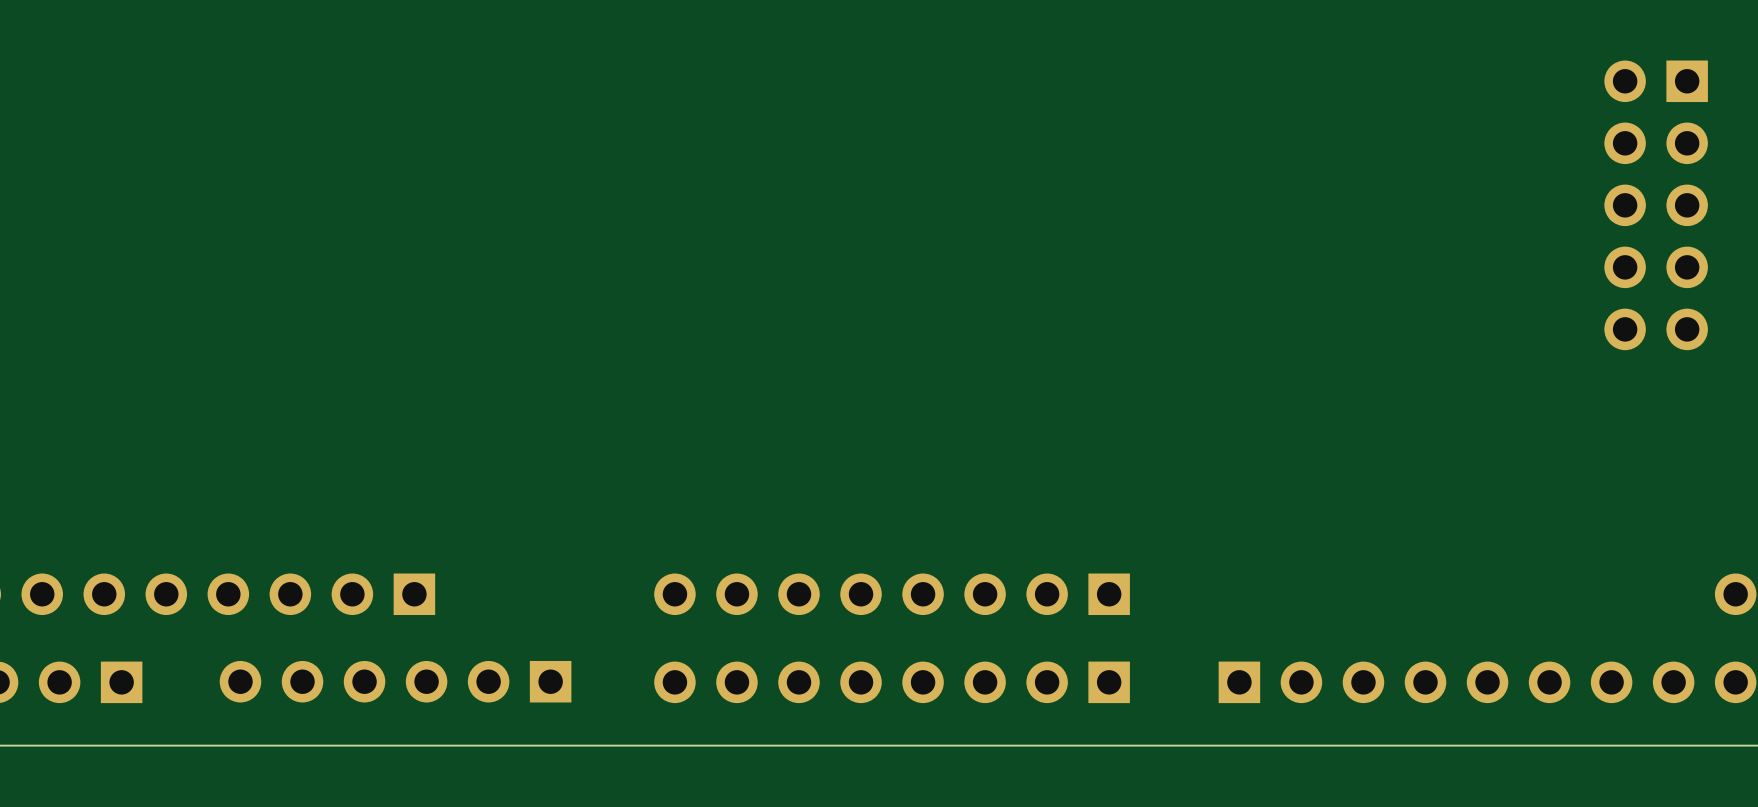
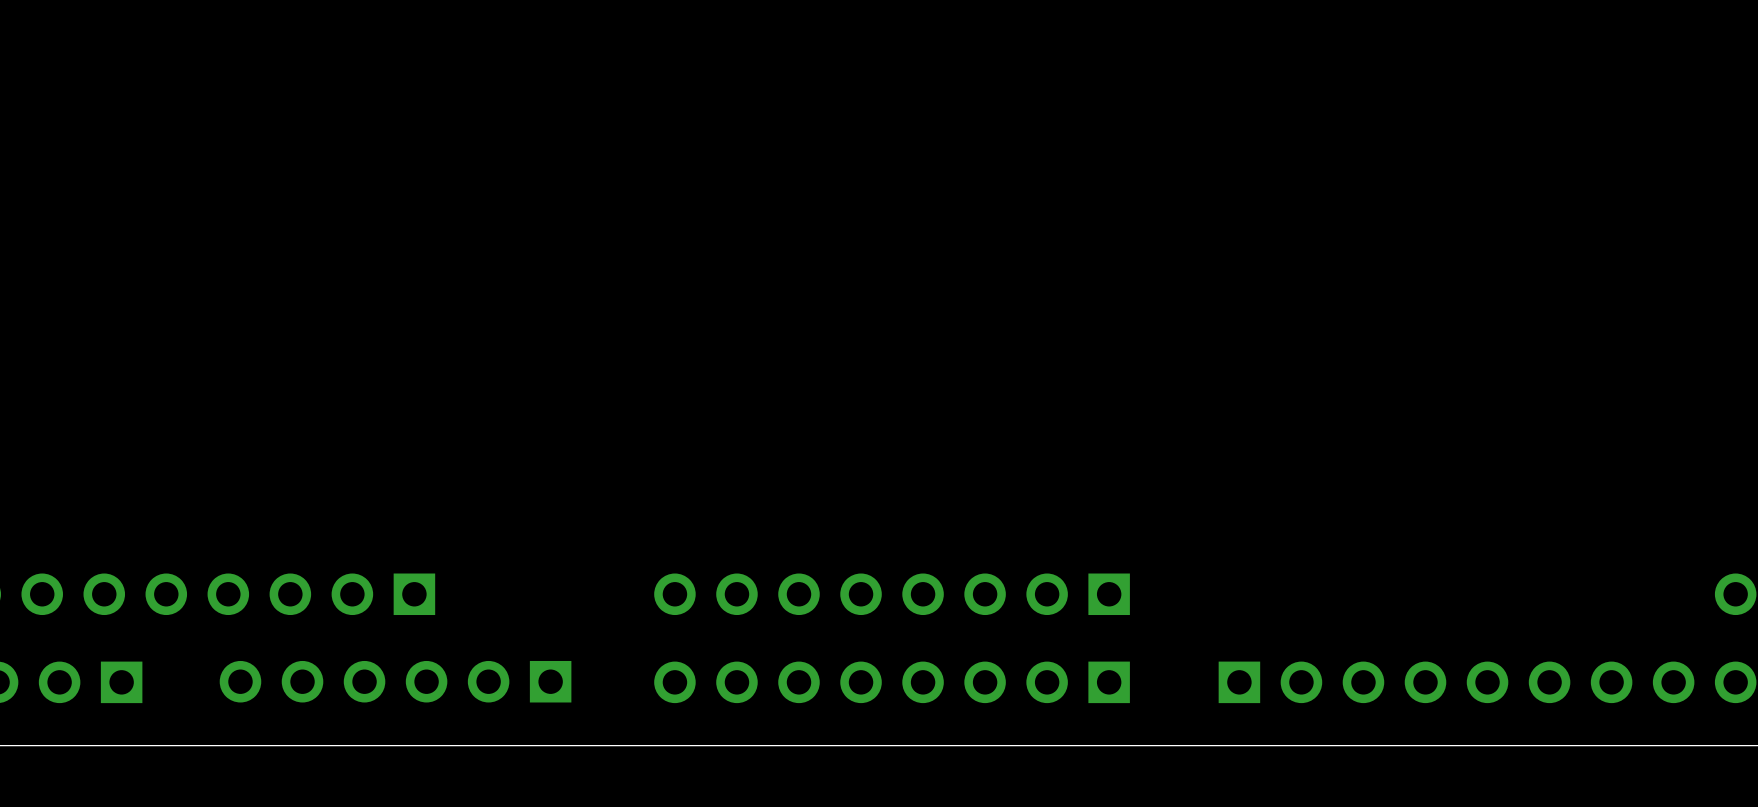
part: (1656, 205) -> none

